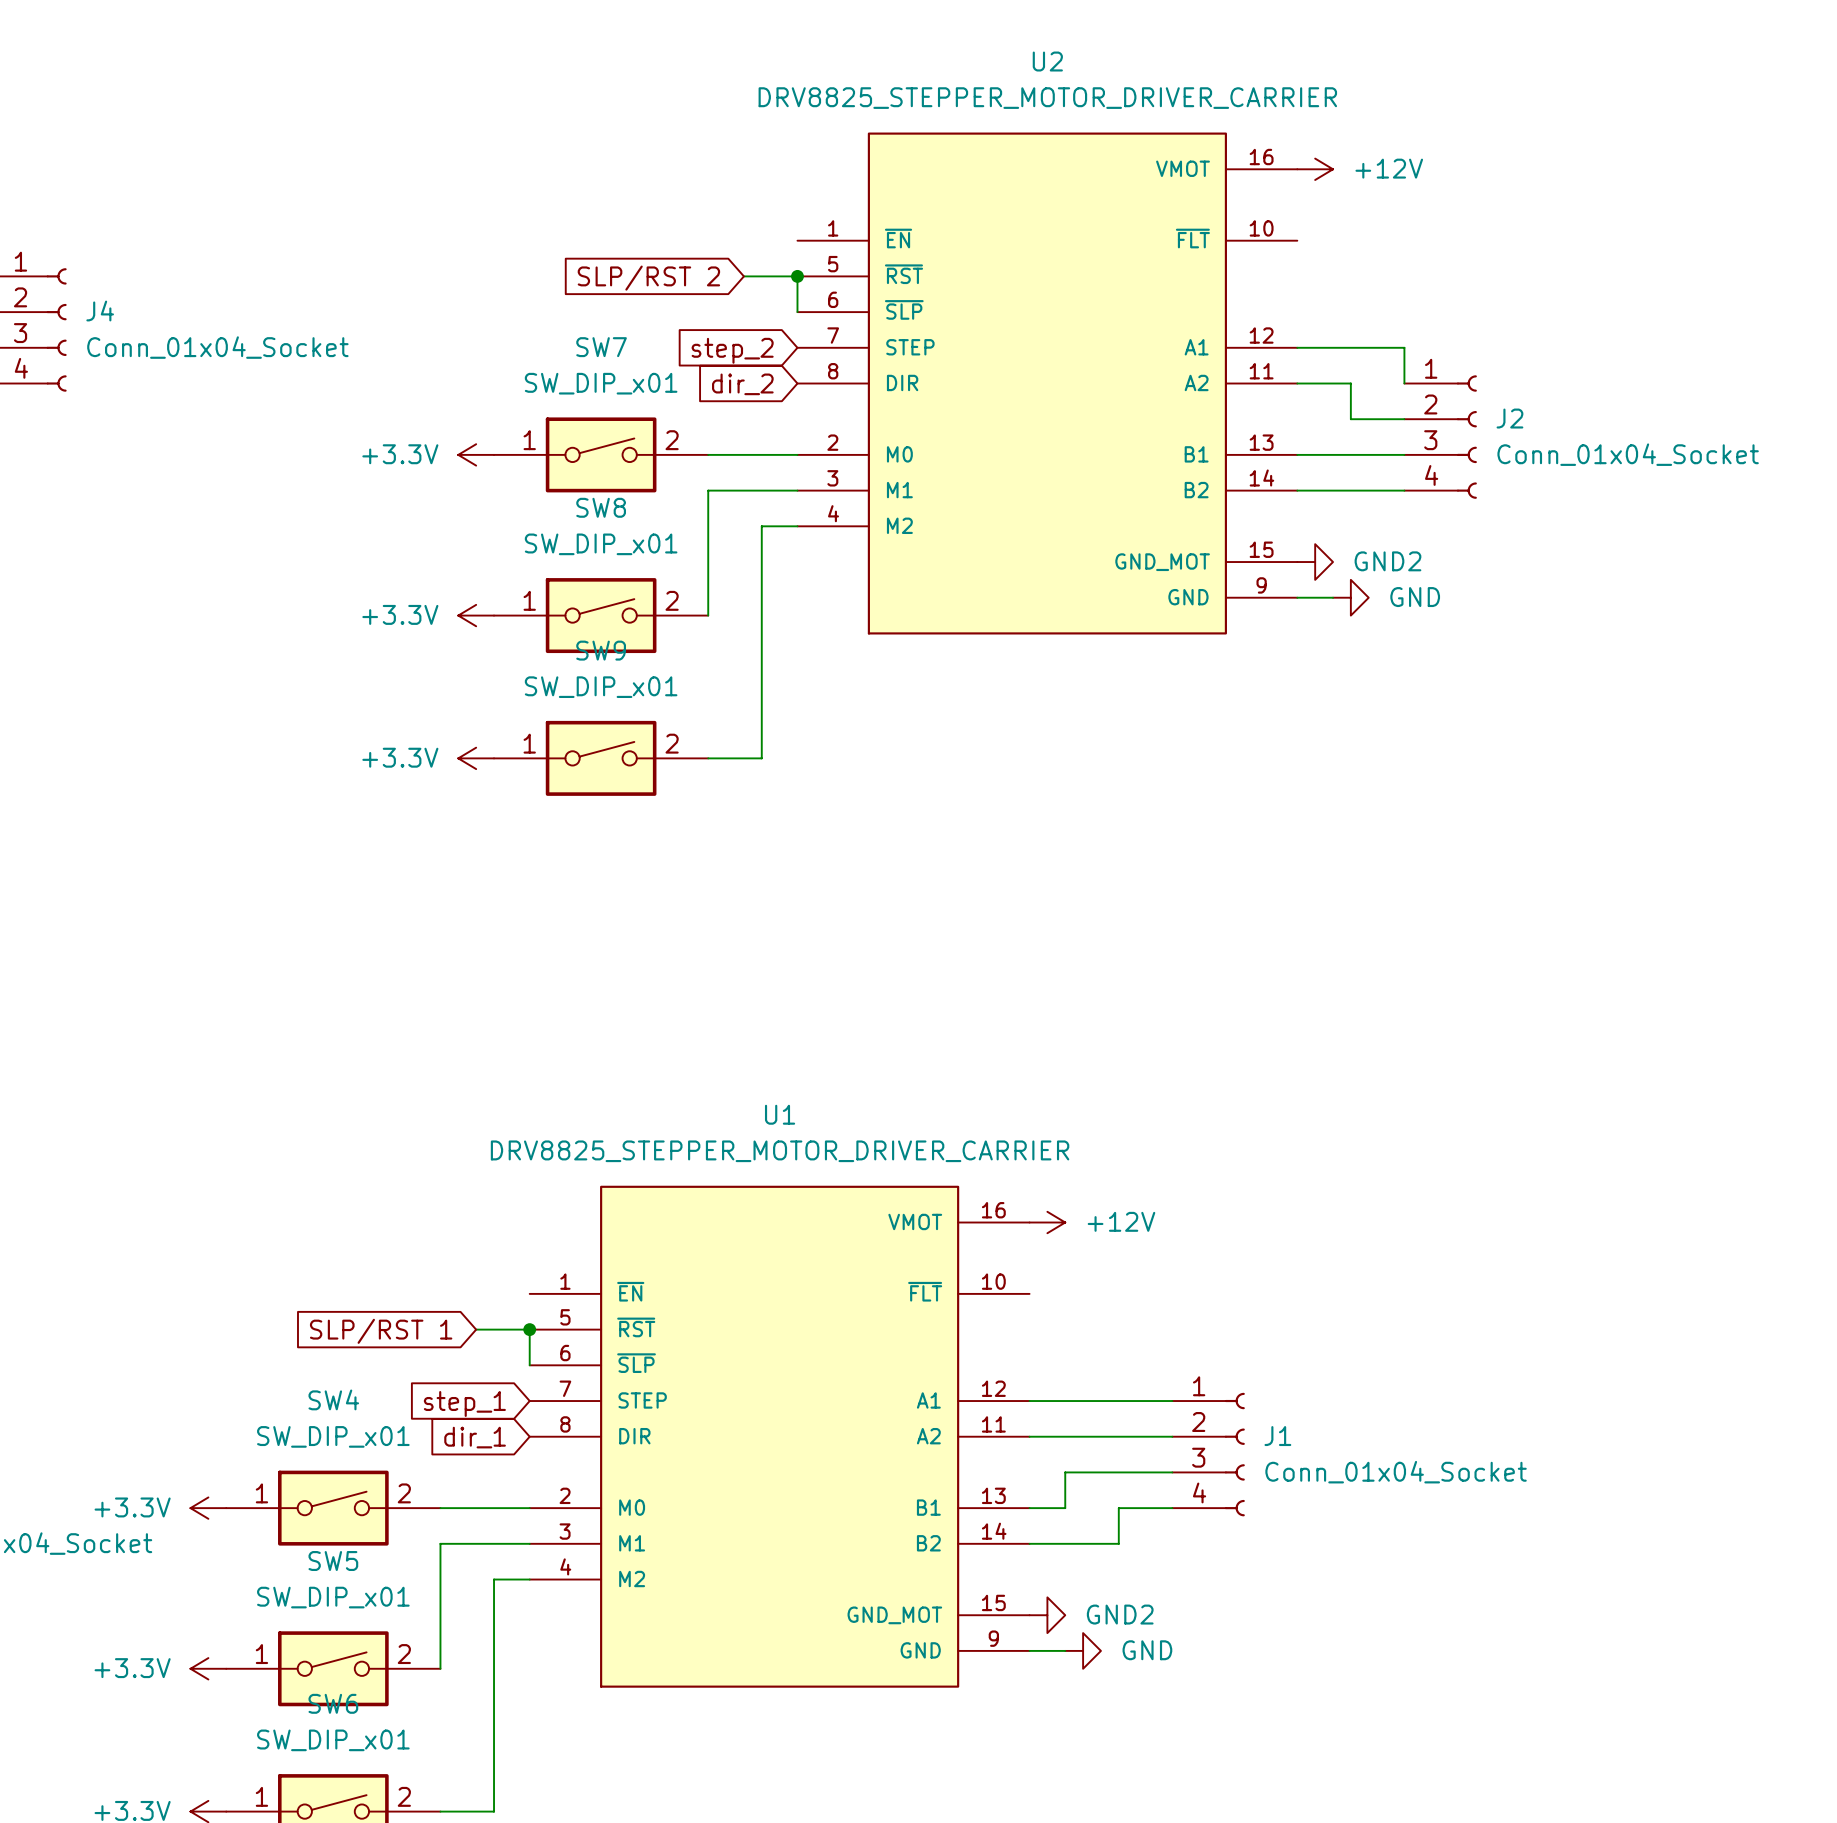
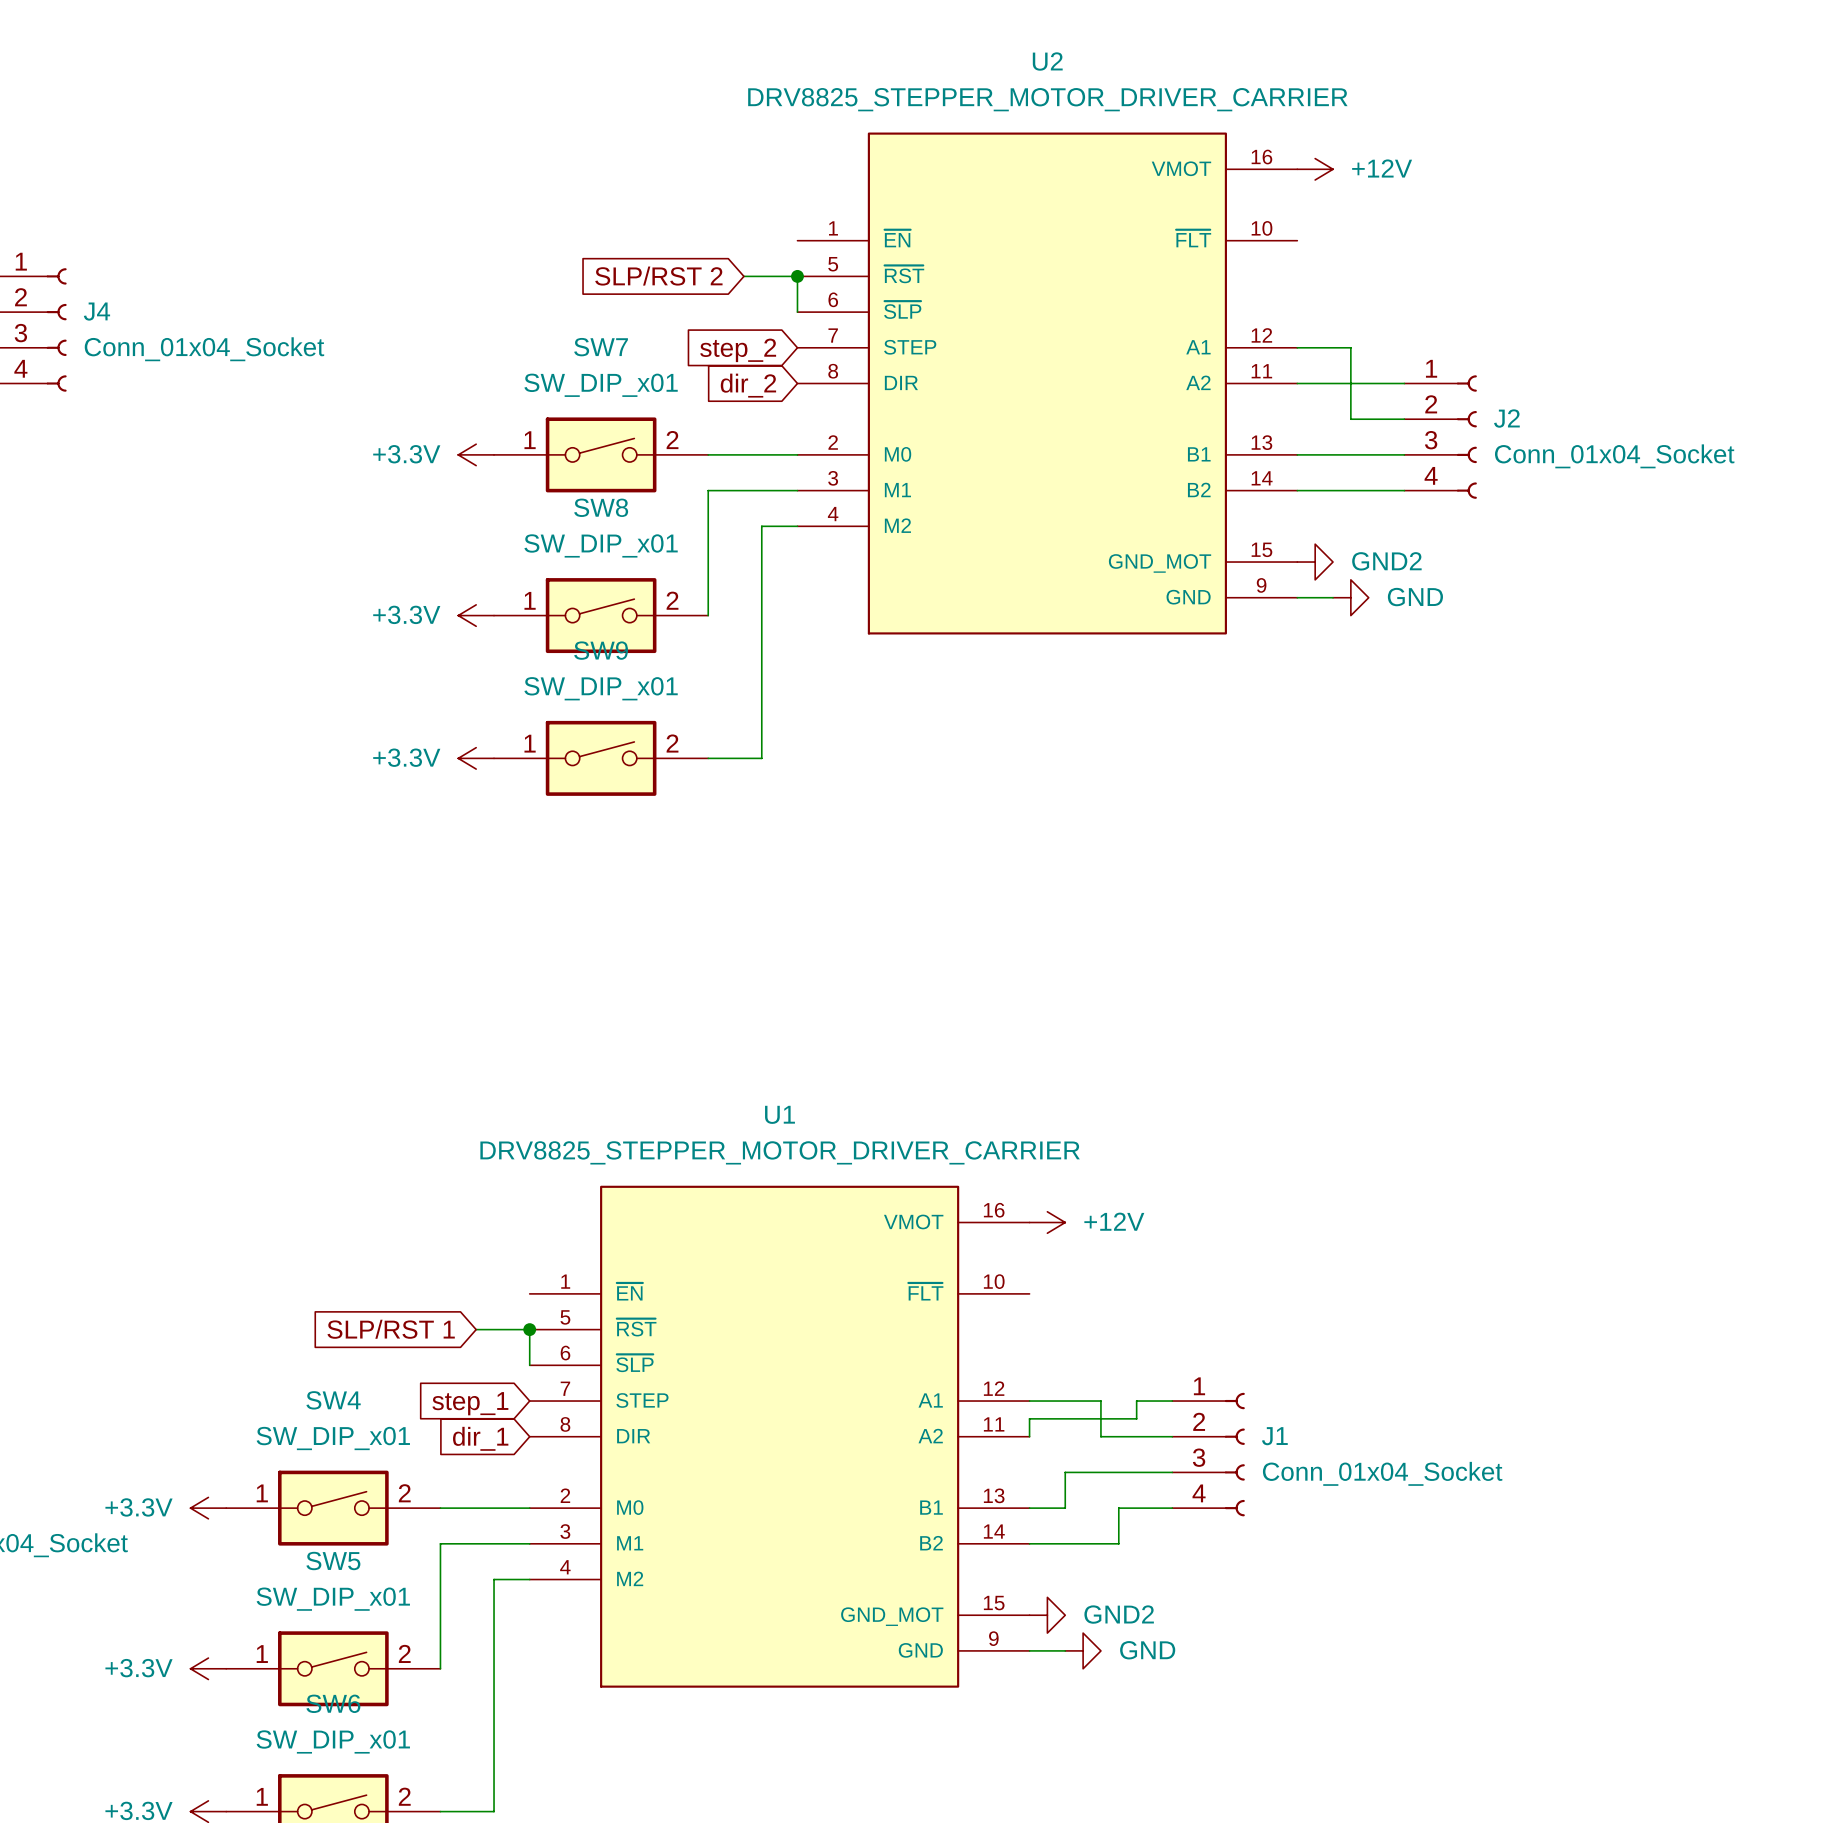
wire: (1350, 347) (1404, 347) (1404, 383) -> (1350, 347) (1350, 383) (1404, 383)
wire: (1100, 1401) (1136, 1401) -> (1100, 1401) (1100, 1436)
wire: (1029, 1436) (1100, 1436) -> (1029, 1436) (1029, 1418) (1136, 1418) (1136, 1401)

